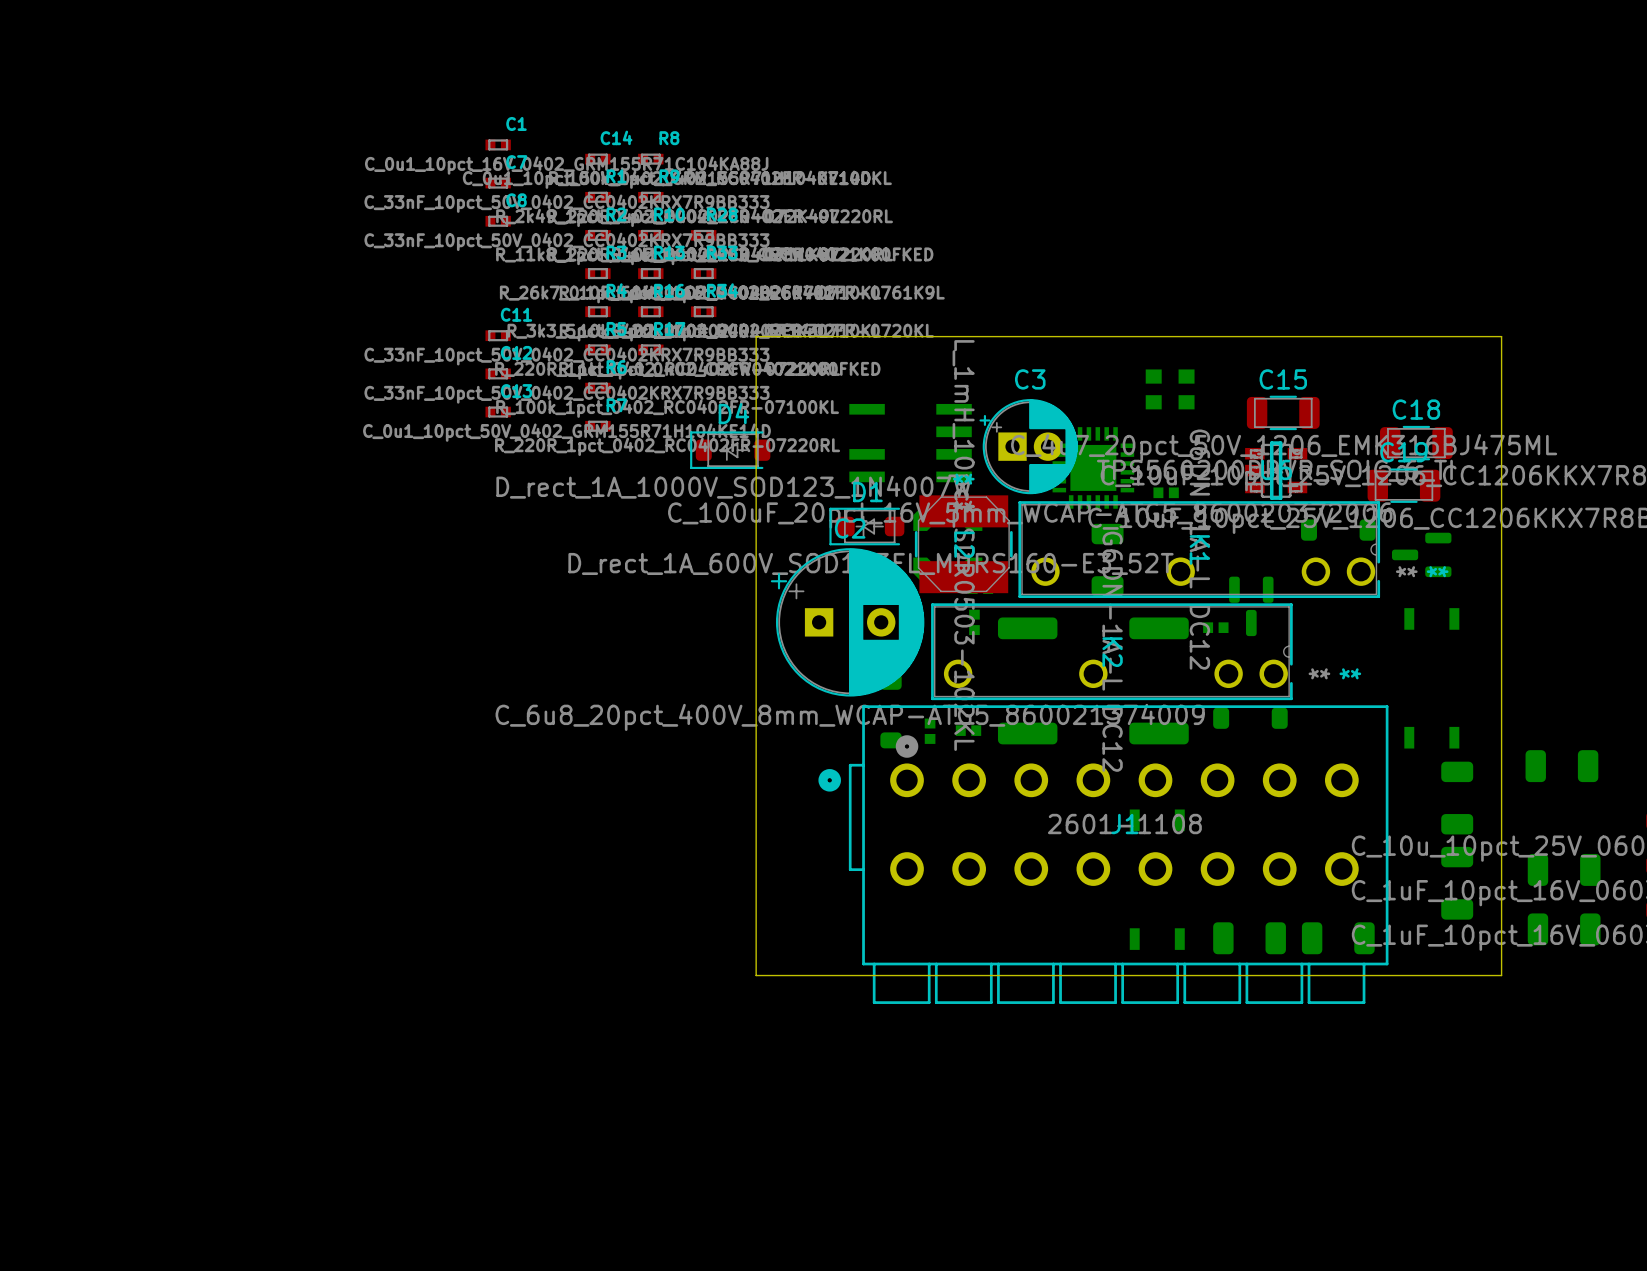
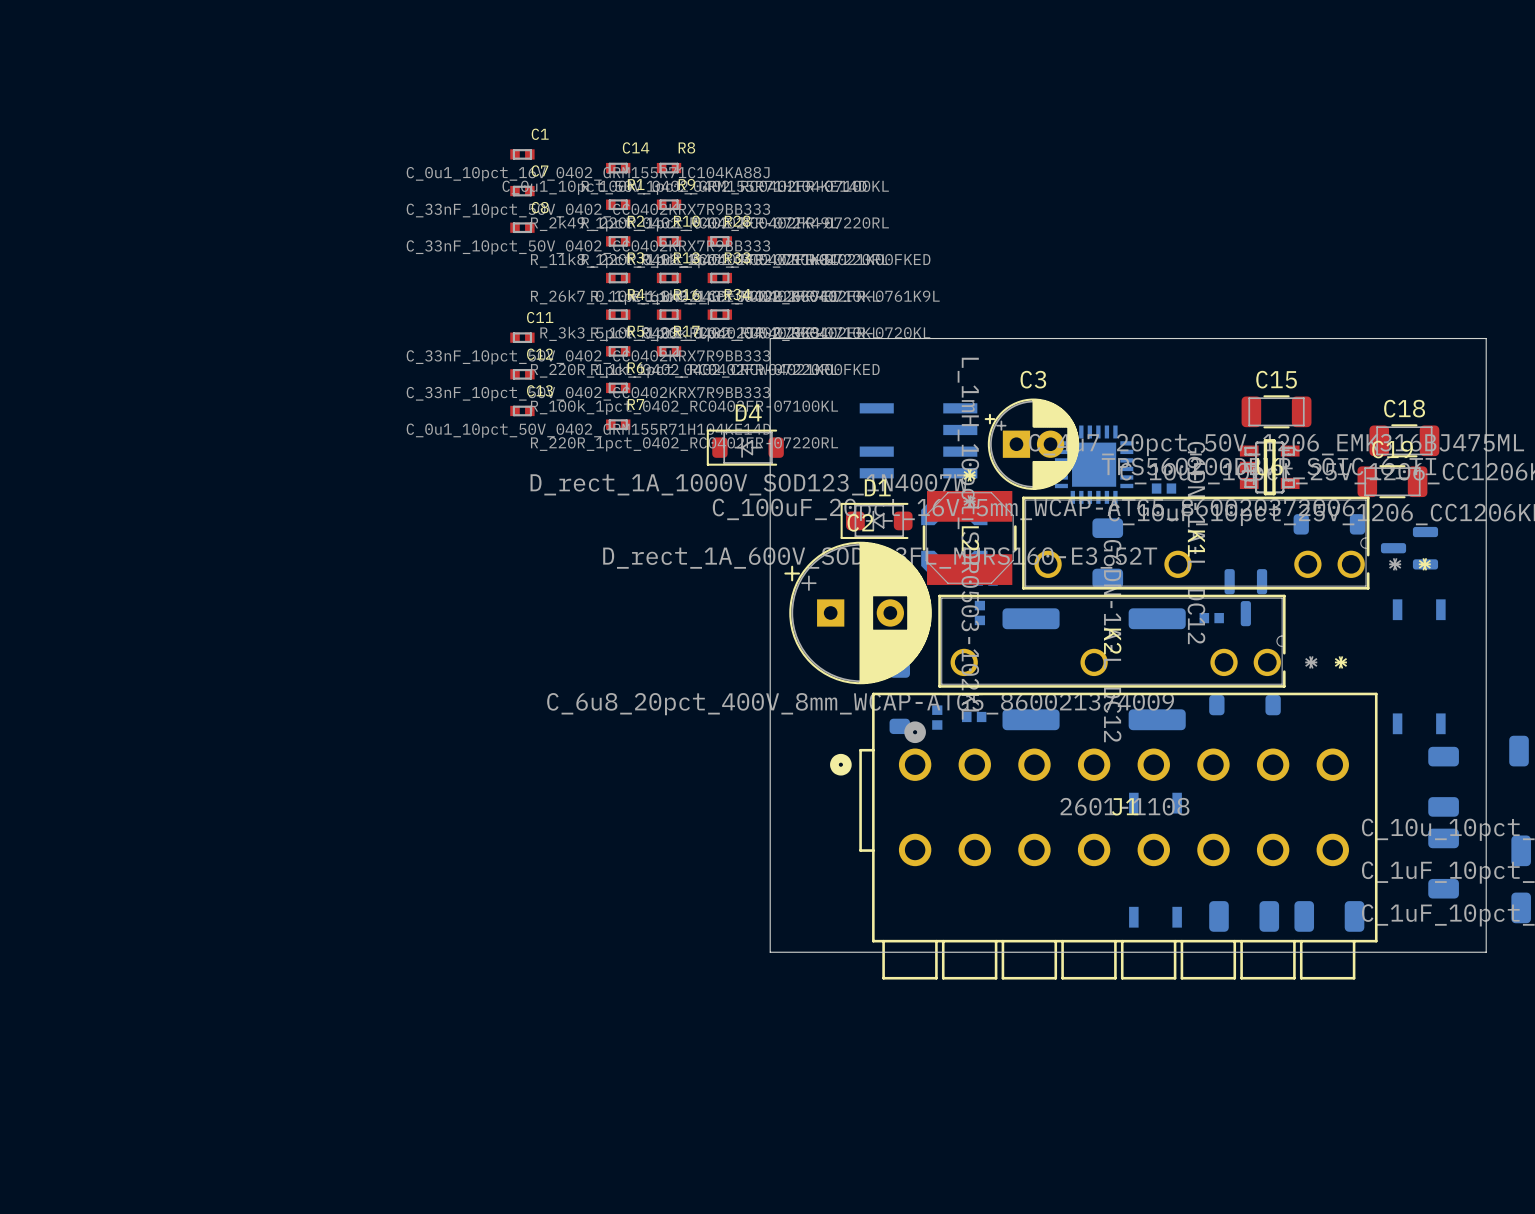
part: (1170, 389) -> none

